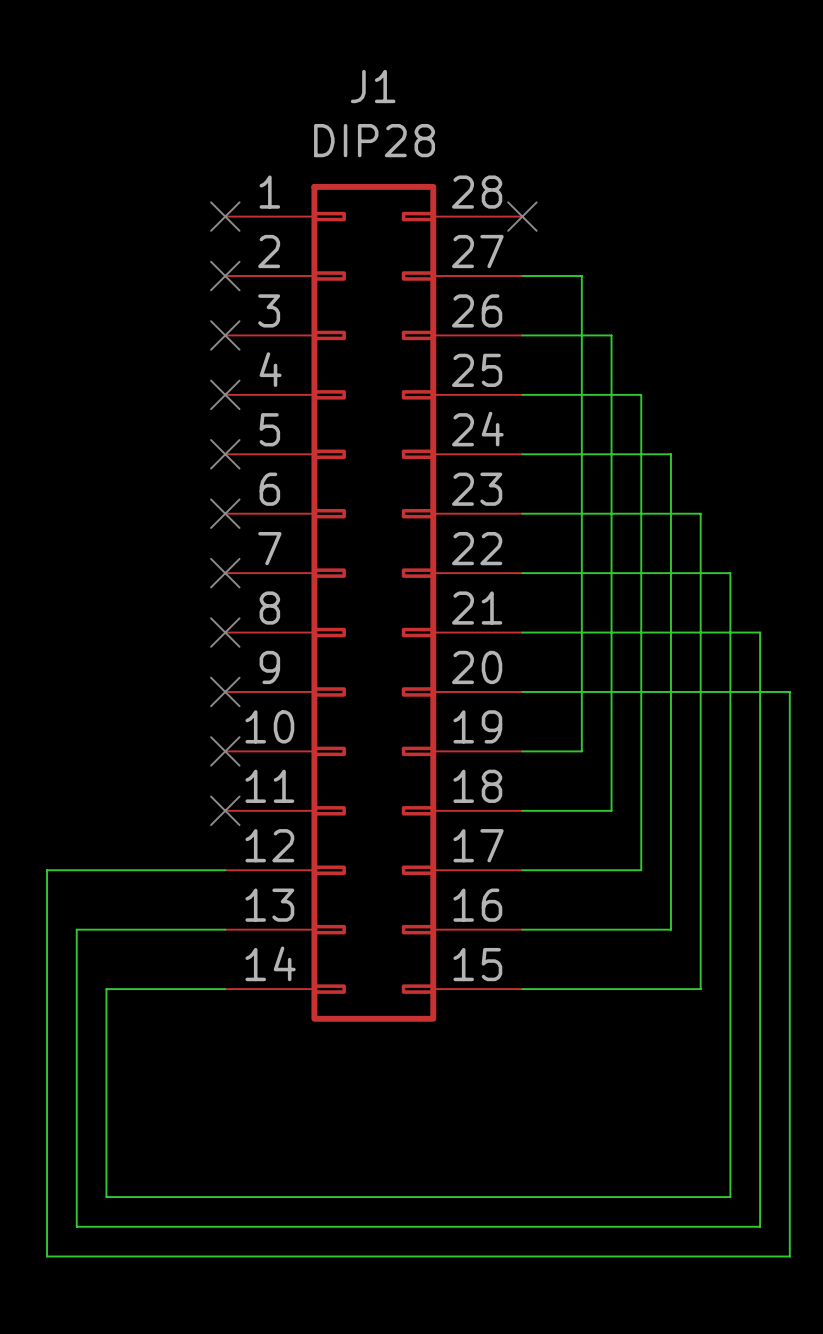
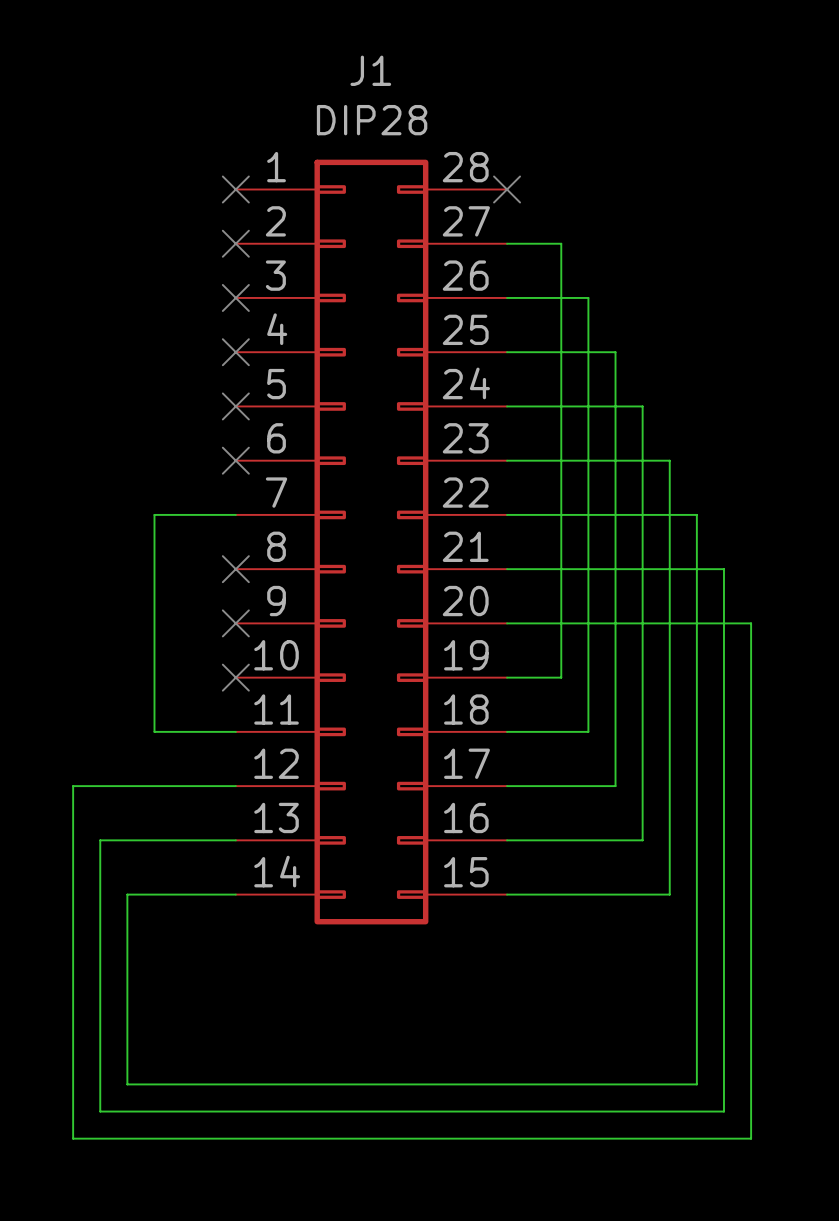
wire: none -> (235, 514) (154, 514) (154, 731) (235, 731)
no-connect mark: (225, 573) -> none
no-connect mark: (225, 810) -> none

